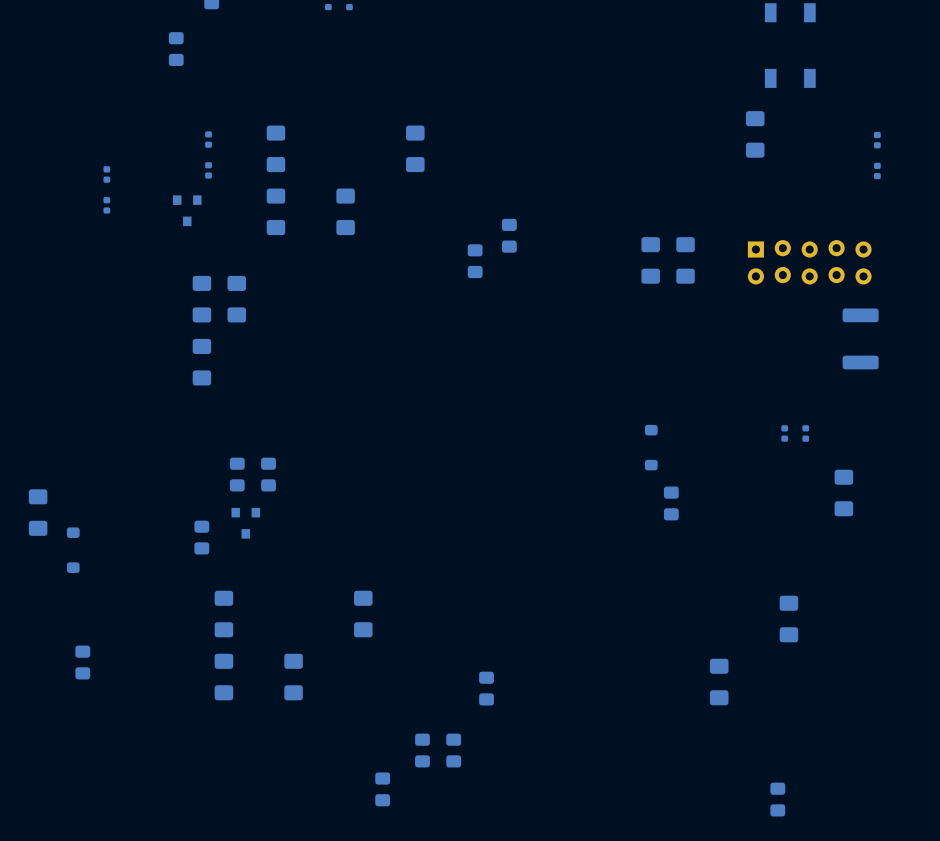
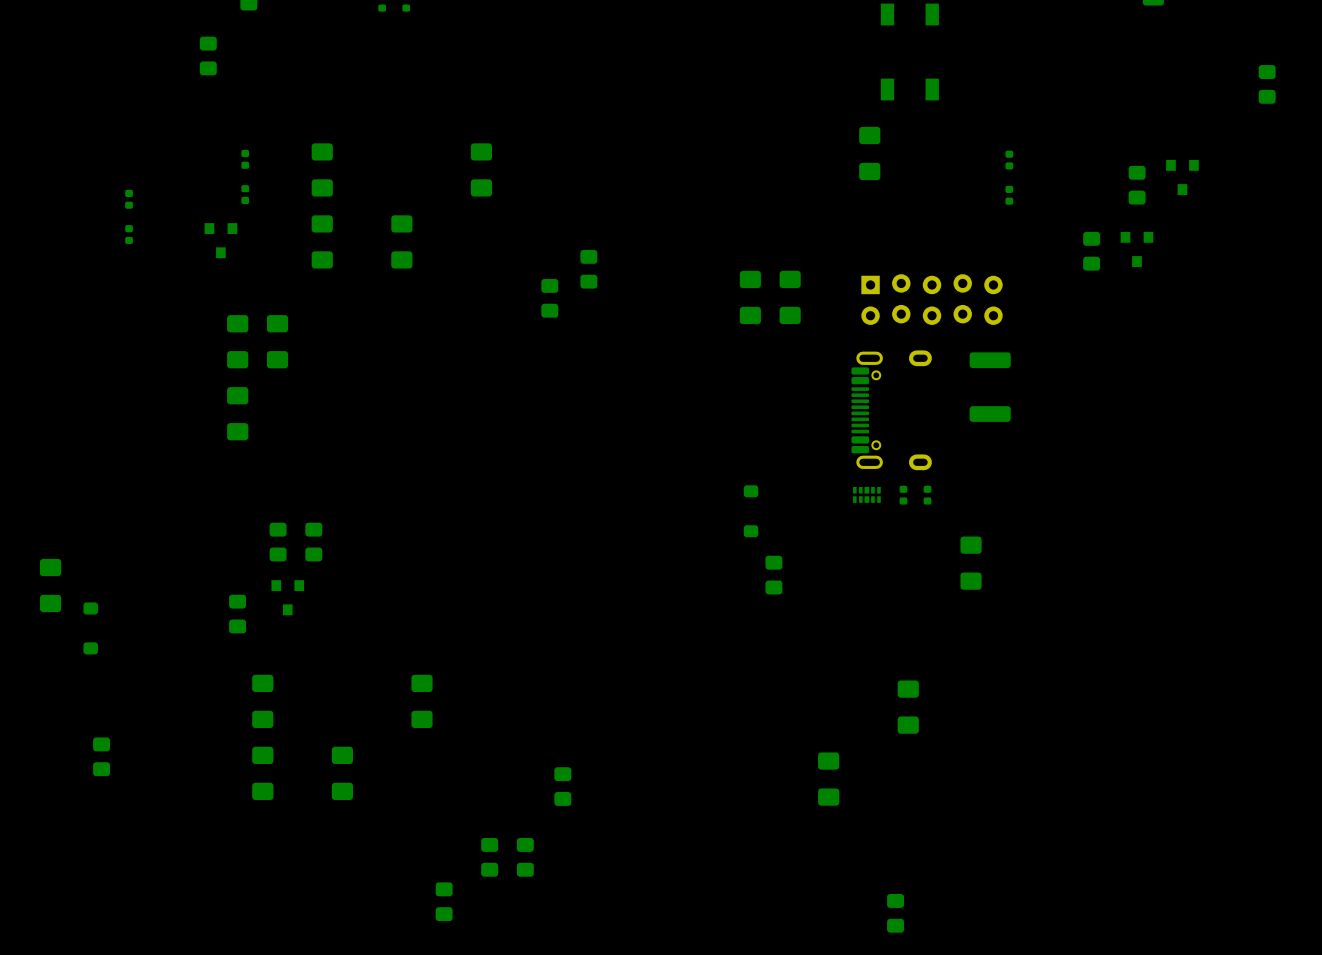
part: none -> (891, 410)
part: none -> (866, 494)

